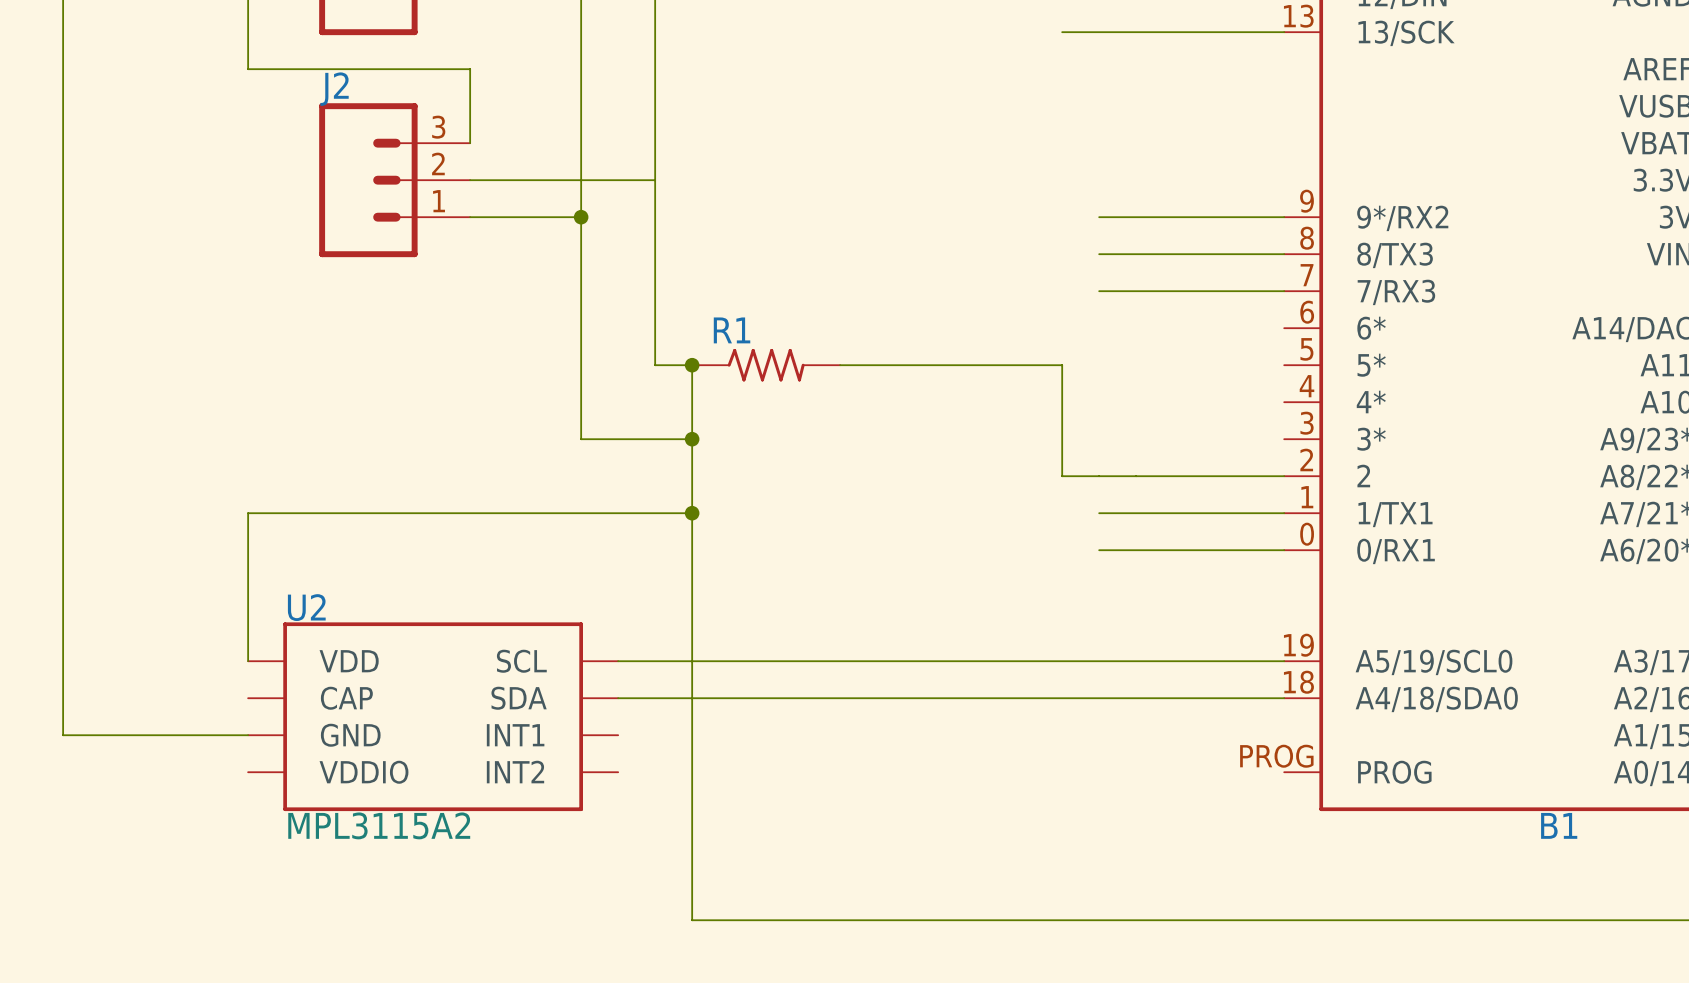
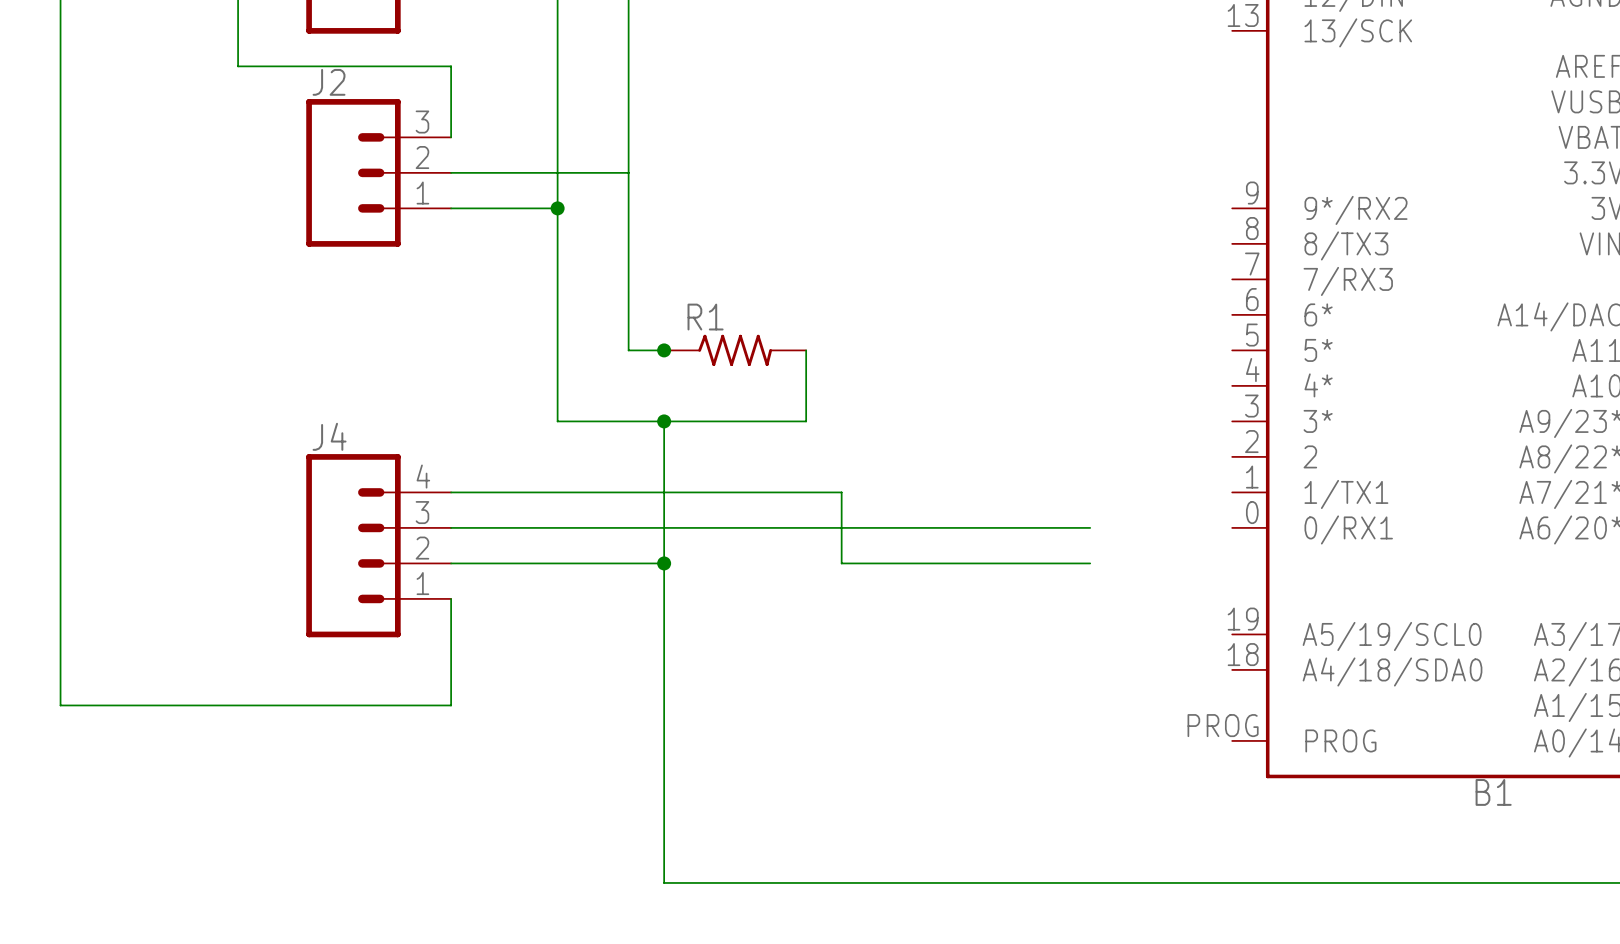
wire: (1062, 32) (1284, 32) -> none
wire: (1099, 217) (1284, 217) -> none
wire: (1099, 254) (1284, 254) -> none
wire: (1099, 291) (1284, 291) -> none
wire: (692, 365) (692, 439) -> (806, 350) (806, 421) (664, 421)
wire: (840, 365) (1062, 365) (1062, 476) (1284, 476) -> none
wire: (470, 513) (248, 513) (248, 661) -> none
wire: none -> (664, 492) (841, 492) (841, 563) (1090, 563)
junction position: (692, 513) -> (664, 563)
wire: (1099, 513) (1284, 513) -> none
wire: none -> (451, 527) (1054, 527)
wire: (1136, 550) (1284, 550) -> none
J4: none -> (378, 545)
wire: none -> (451, 563) (664, 563)
wire: none -> (451, 598) (451, 705) (238, 705)
wire: (618, 661) (1284, 661) -> none
wire: (618, 698) (1284, 698) -> none
U2: MPL3115A2 (433, 716) -> none

